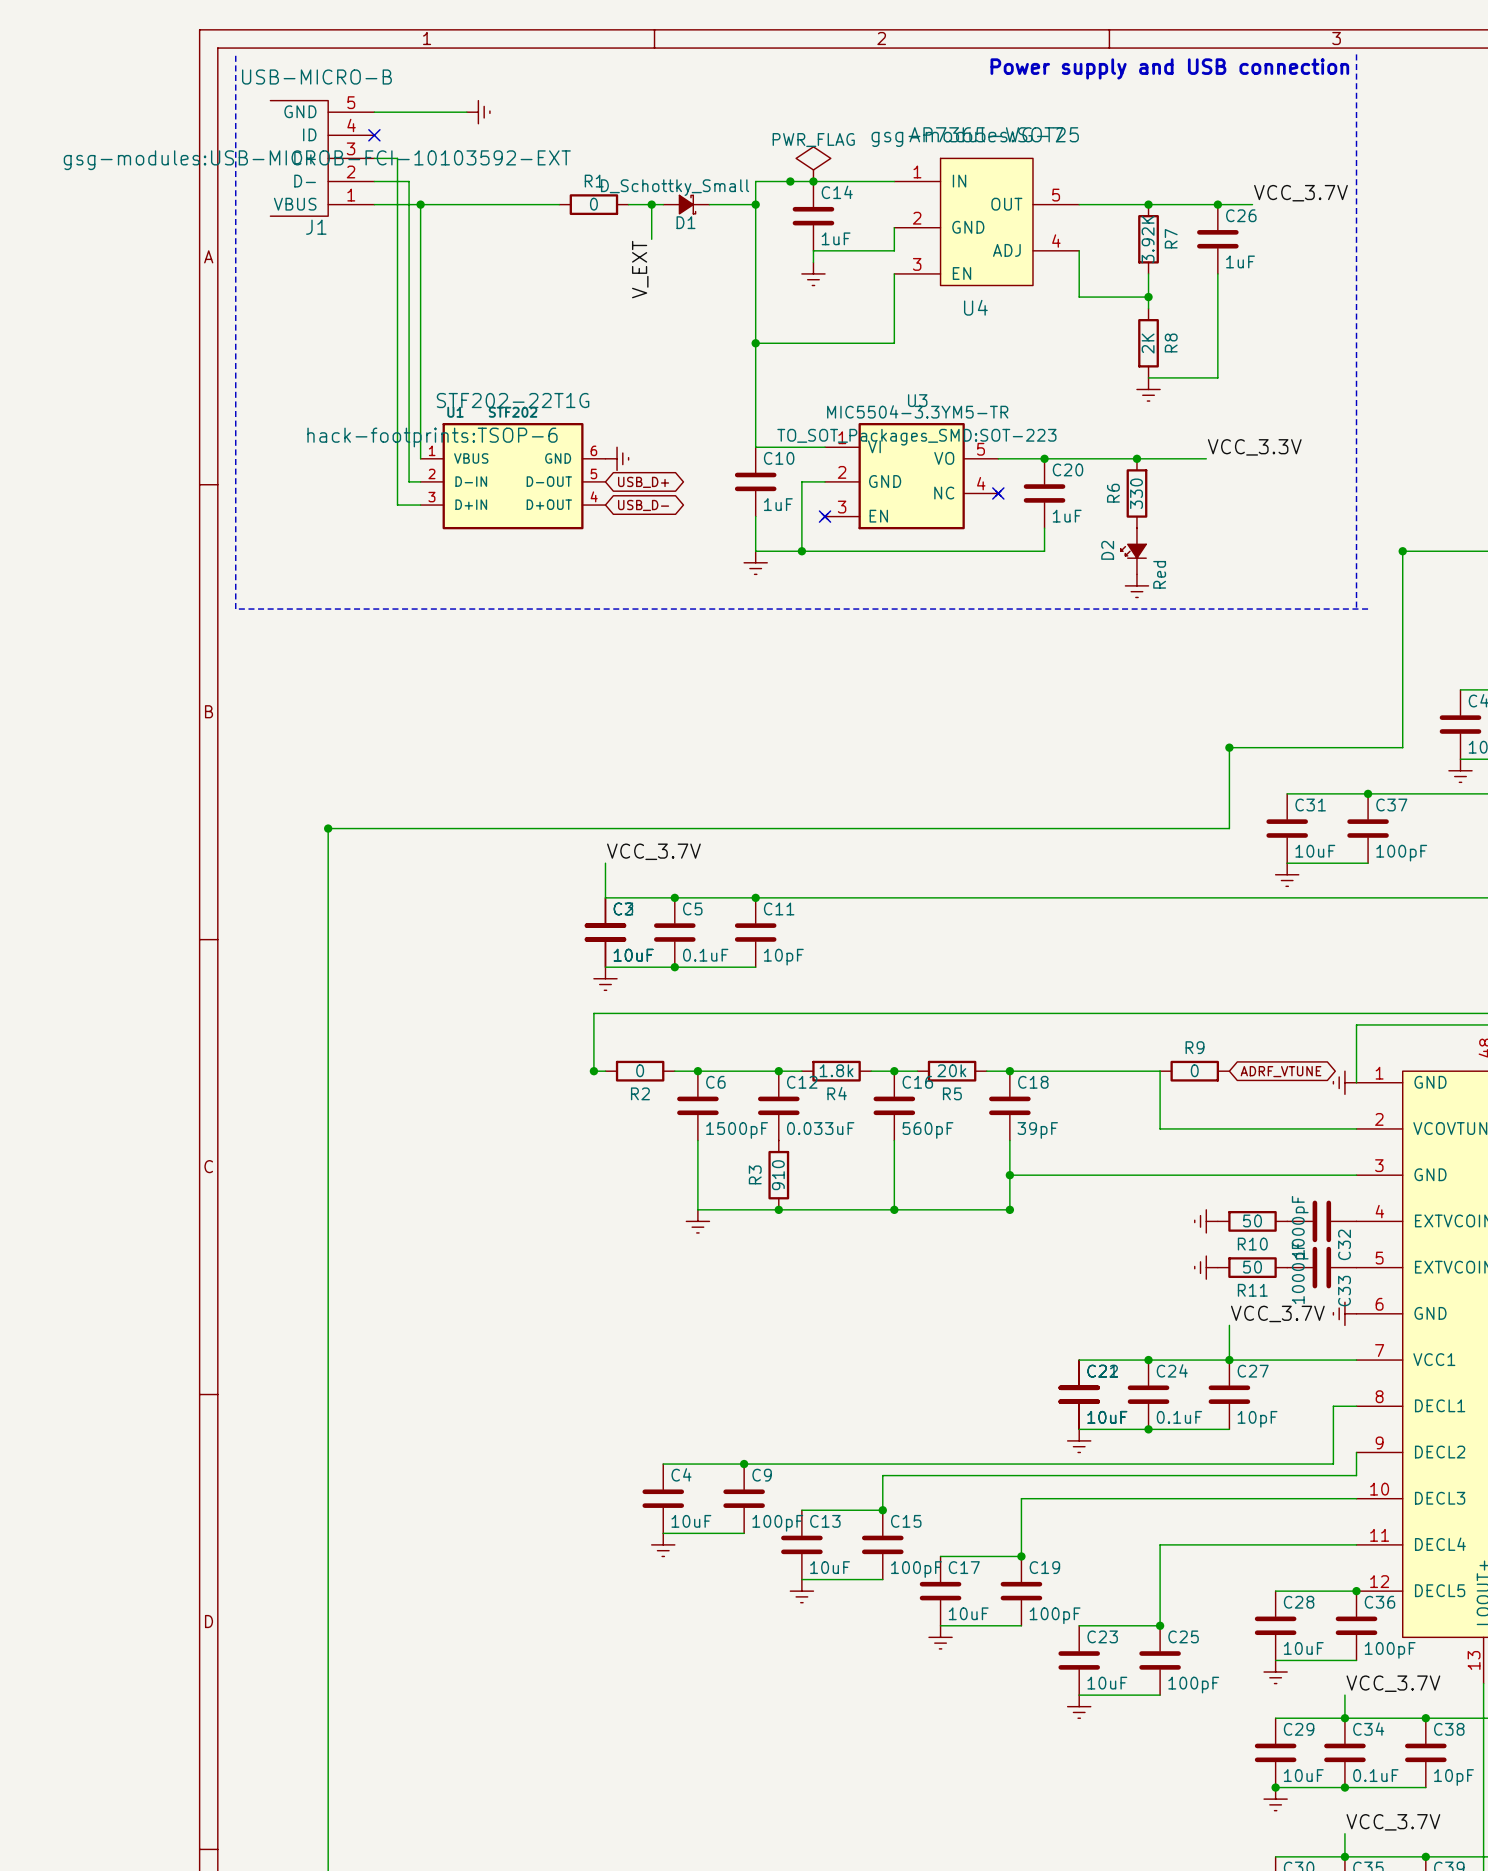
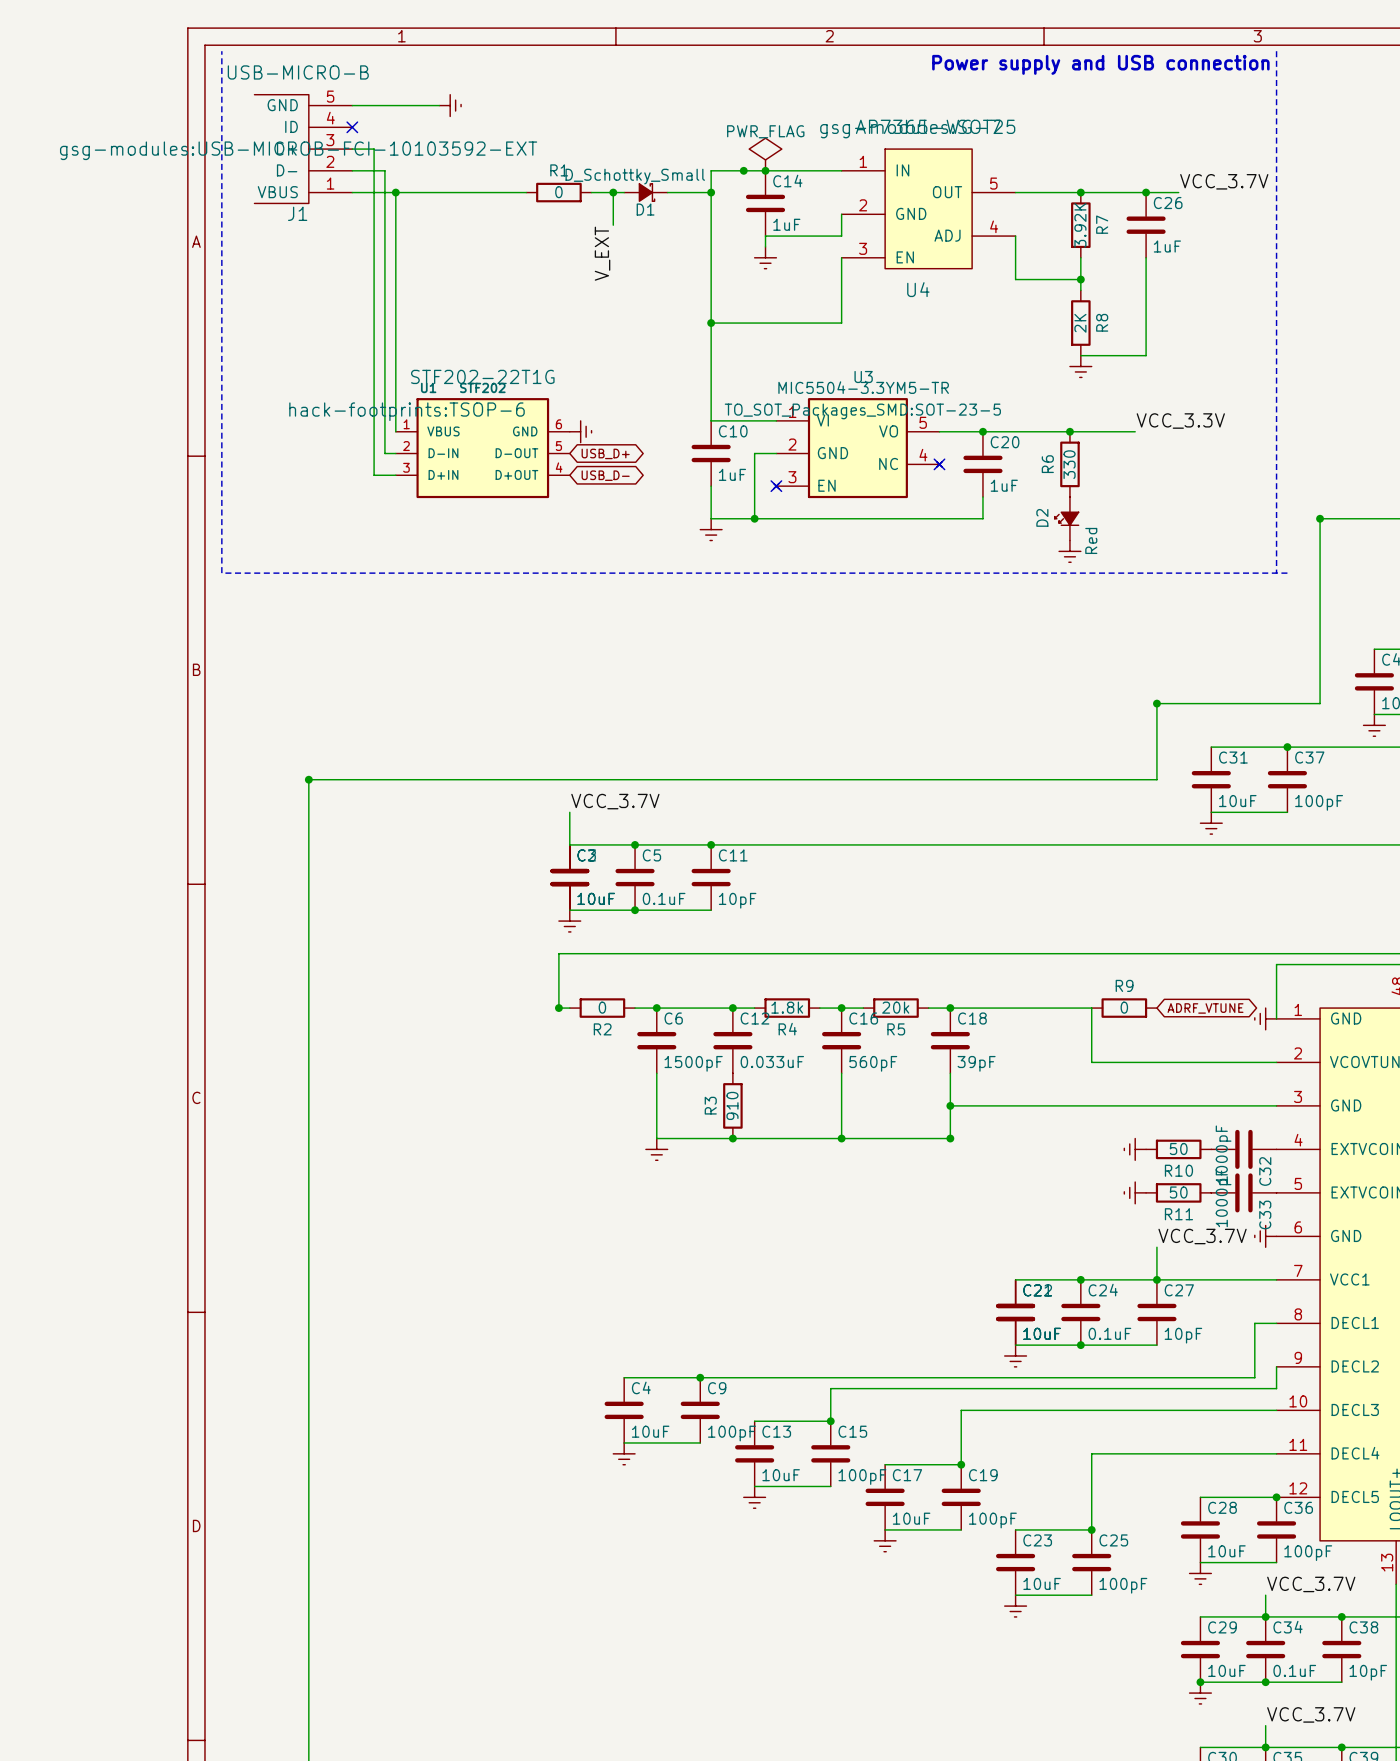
U3 text: TO_SOT_Packages_SMD:SOT-223 (916, 437) -> TO_SOT_Packages_SMD:SOT-23-5 (862, 411)

